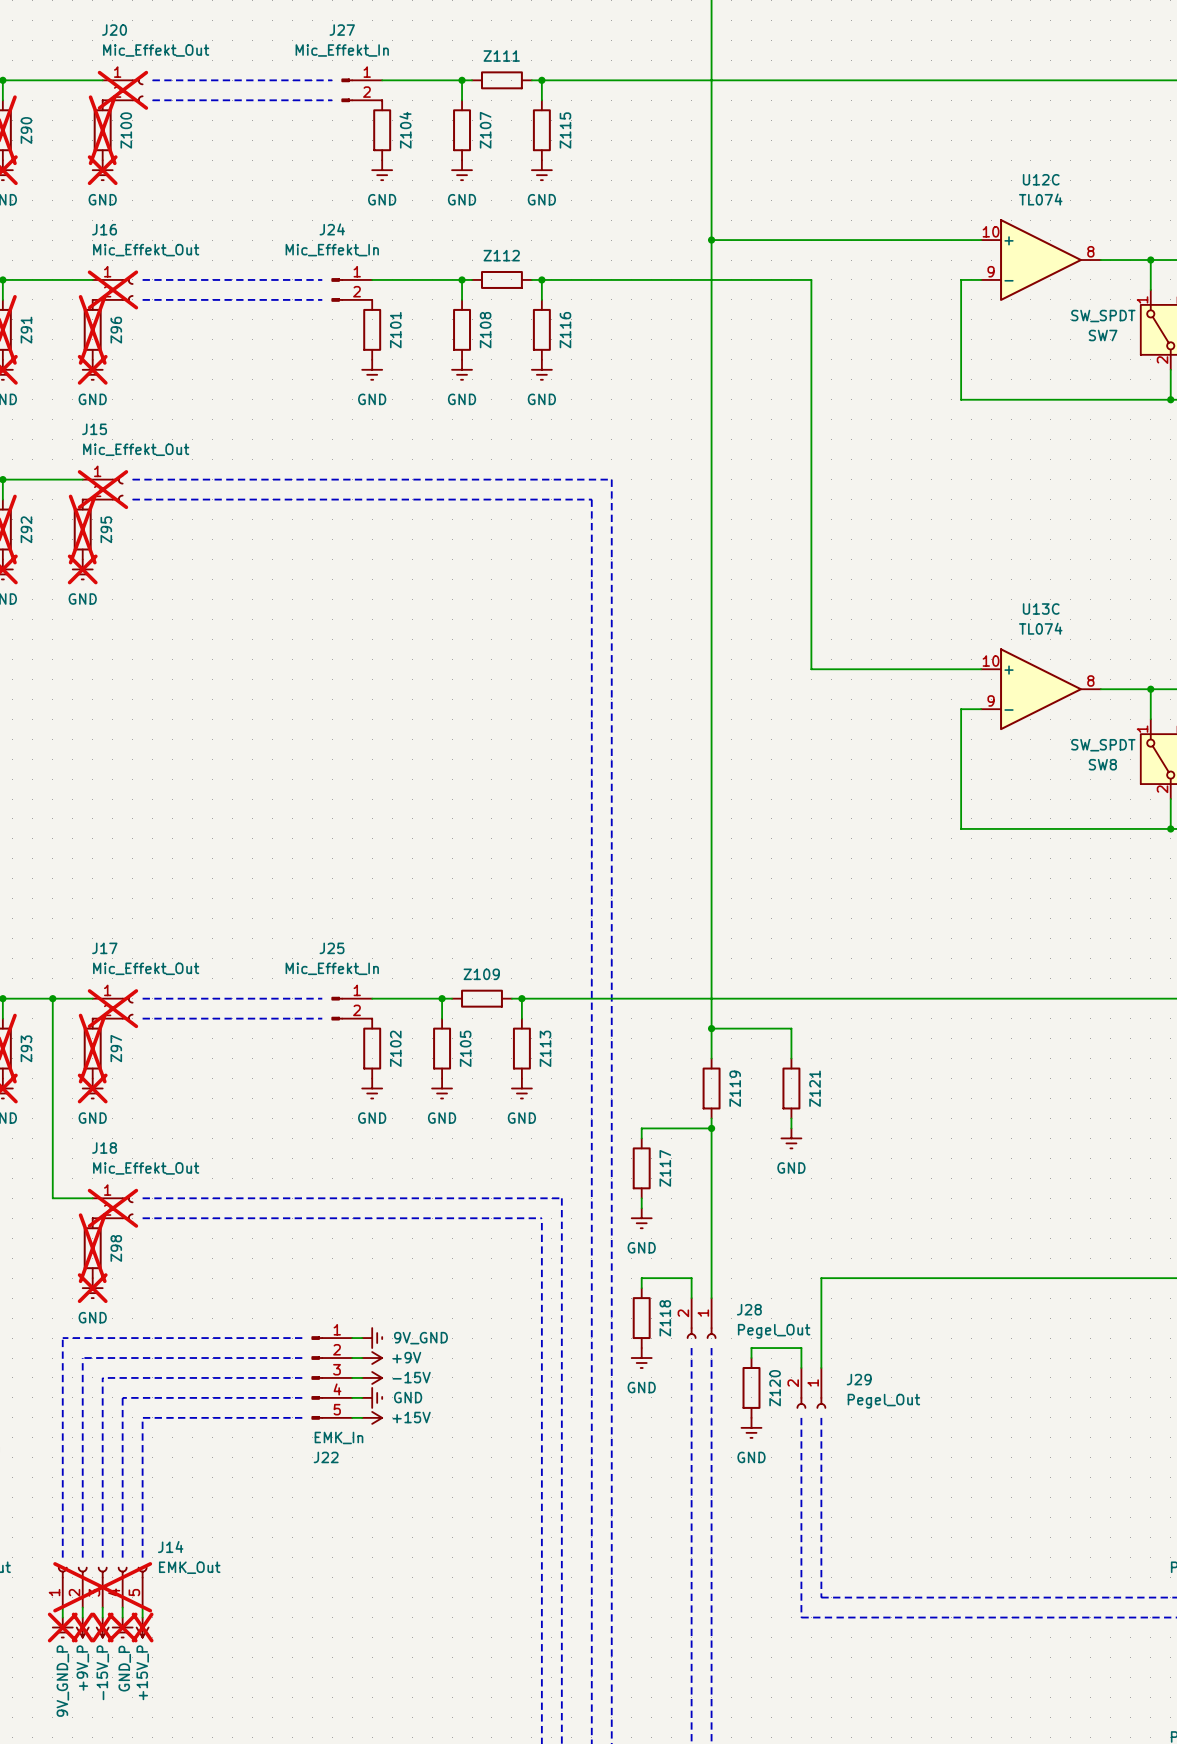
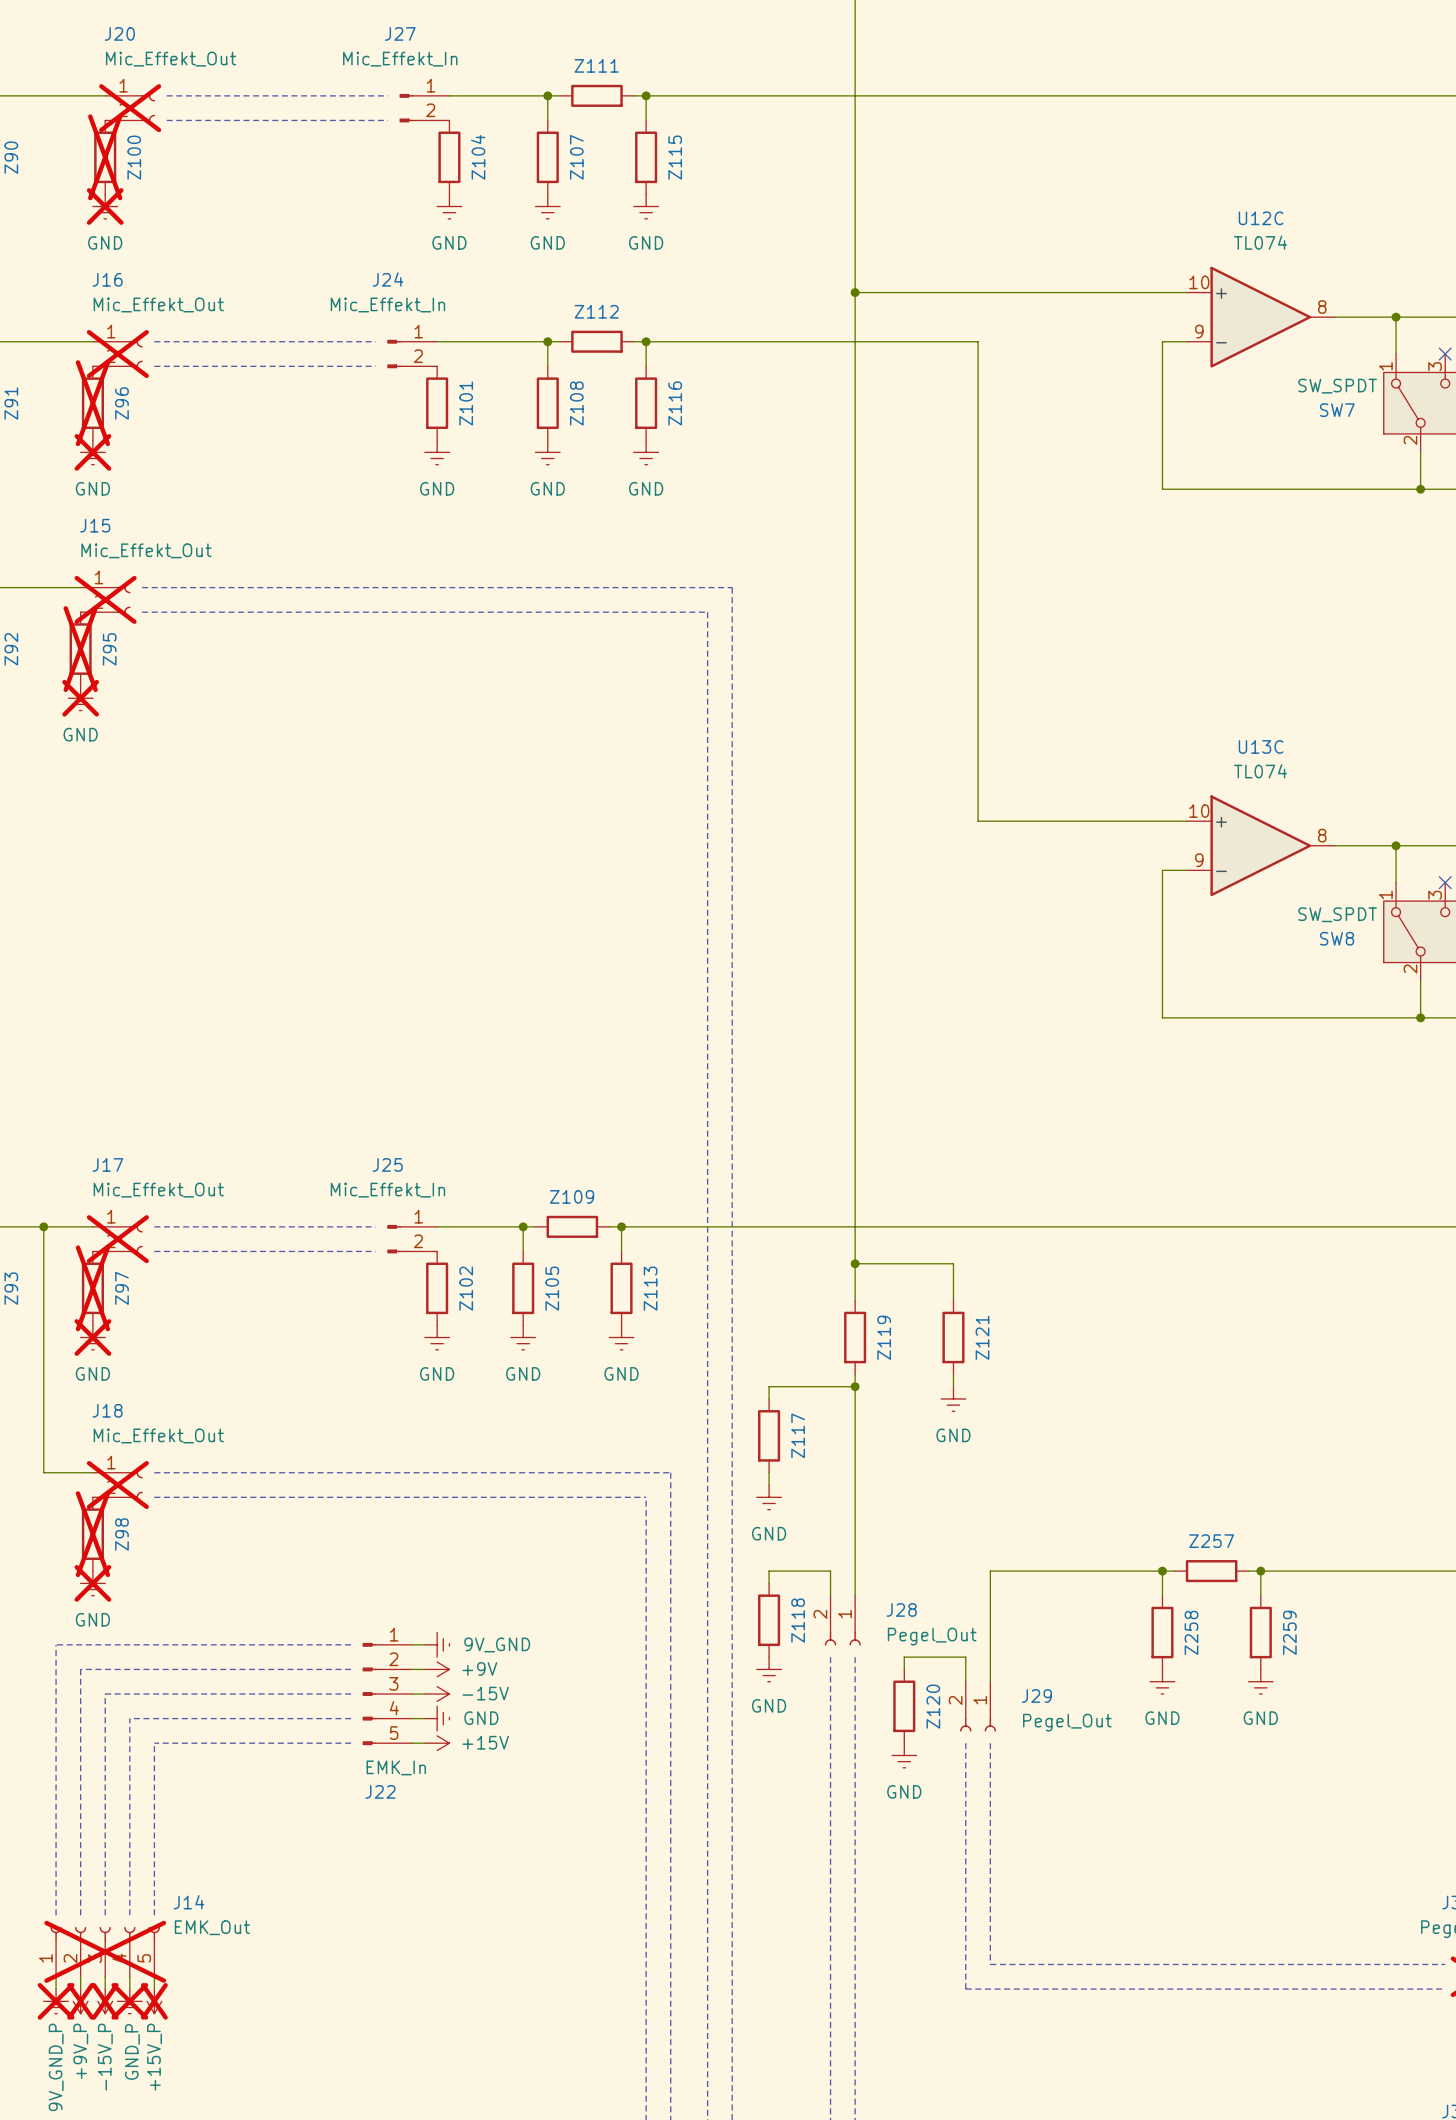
wire: none -> (1162, 1571) (1162, 1595)
junction: none -> (1162, 1571)
wire: (971, 1278) (1030, 1278) -> none
Z257: none -> (1211, 1571)
wire: none -> (1260, 1571) (1260, 1595)
junction: none -> (1260, 1571)
Z258: none -> (1162, 1632)
Z259: none -> (1260, 1632)
power symbol: none -> GND (1162, 1681)
power symbol: none -> GND (1260, 1681)

